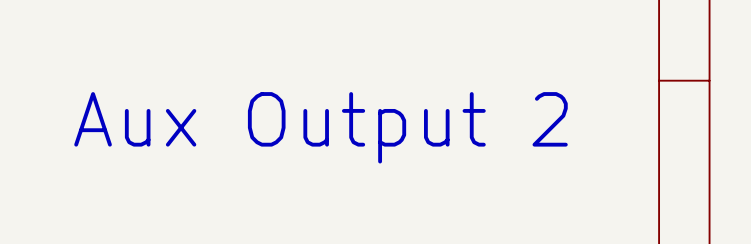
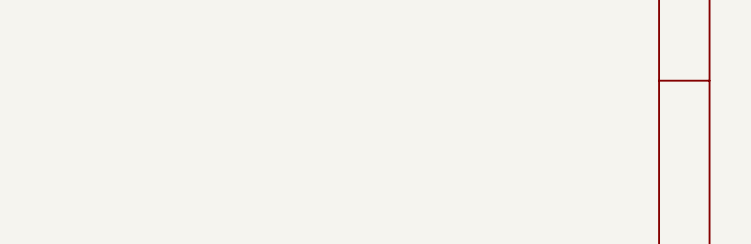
text: Aux Output 2 (320, 127) -> none

